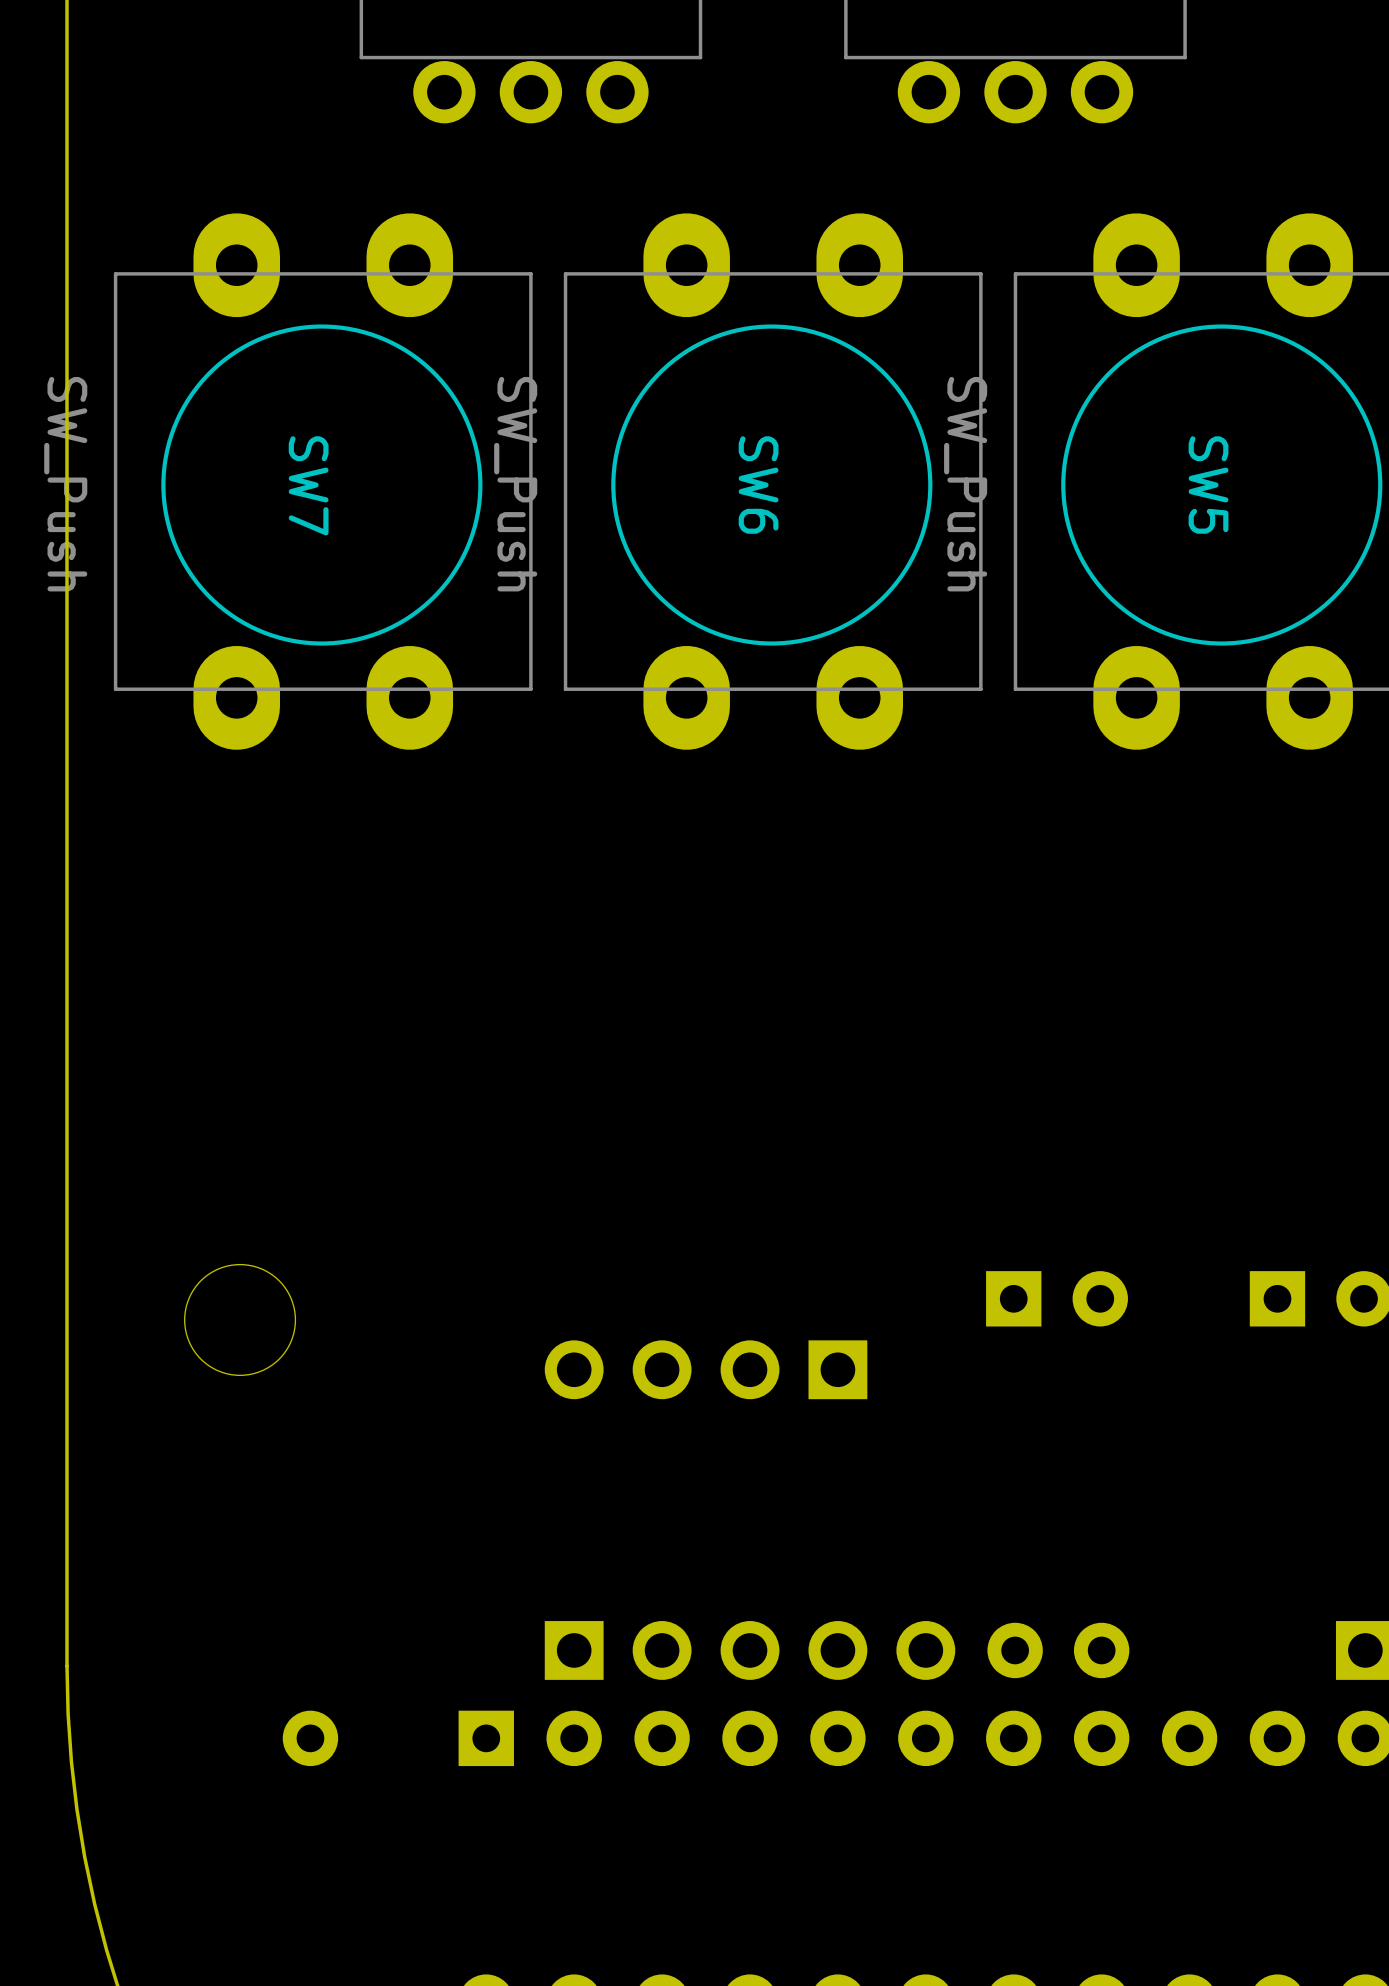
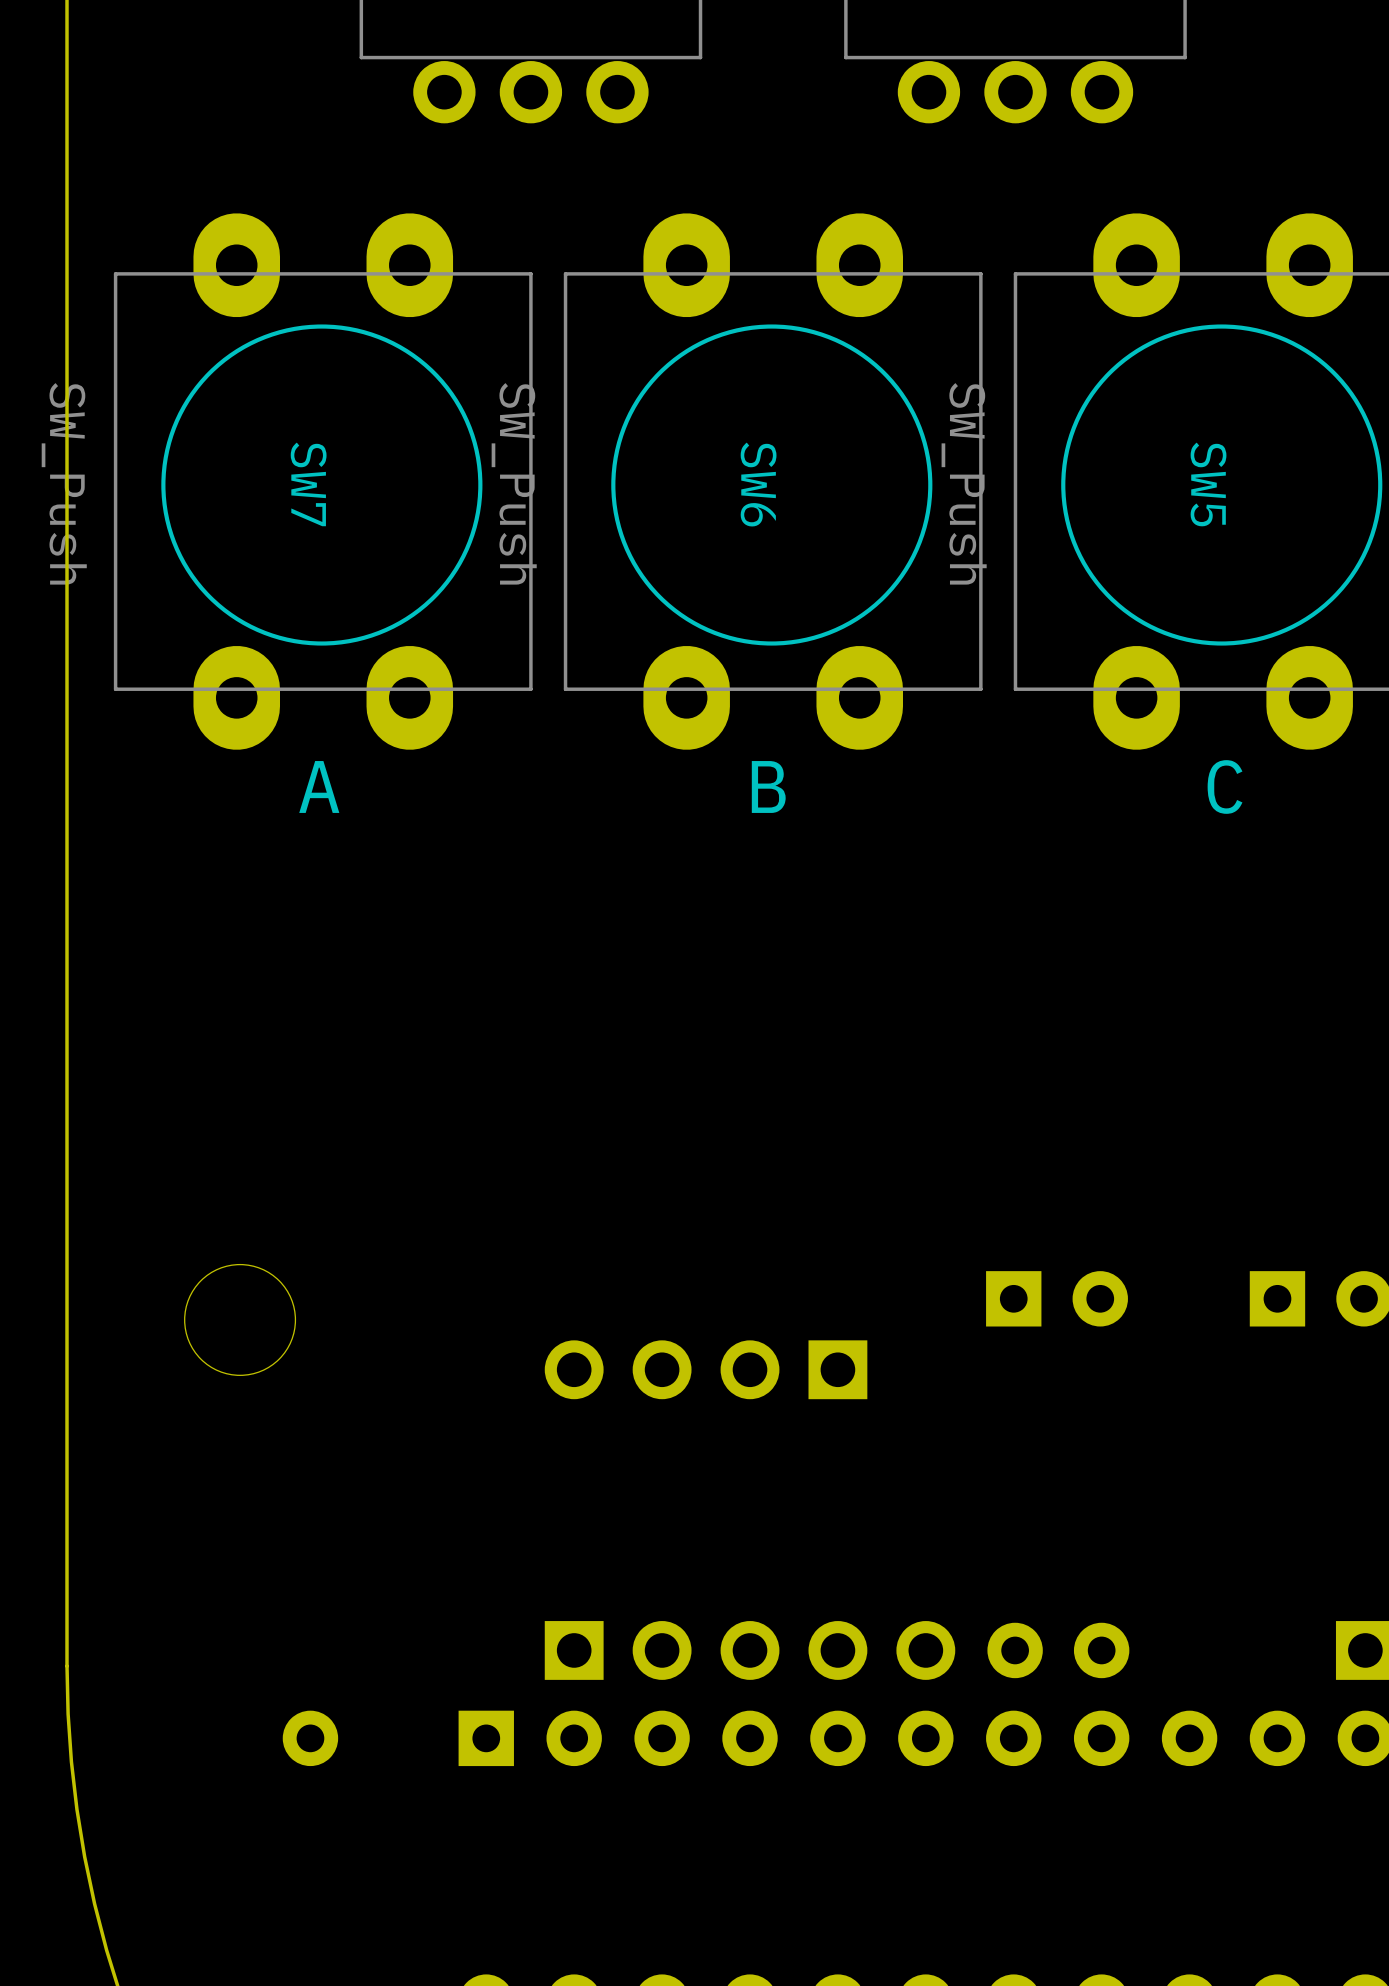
text: none -> A (319, 786)
text: none -> B (768, 786)
text: none -> C (1225, 786)

